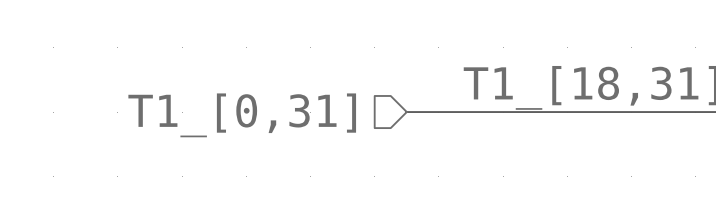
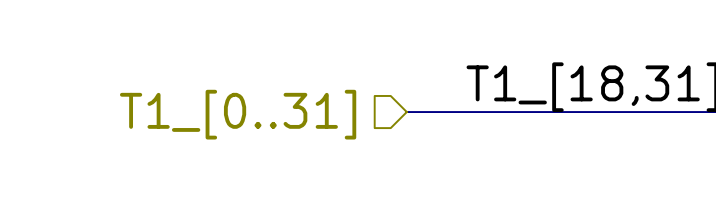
hierarchical label: T1_[0,31] (242, 115) -> T1_[0..31] (238, 114)

